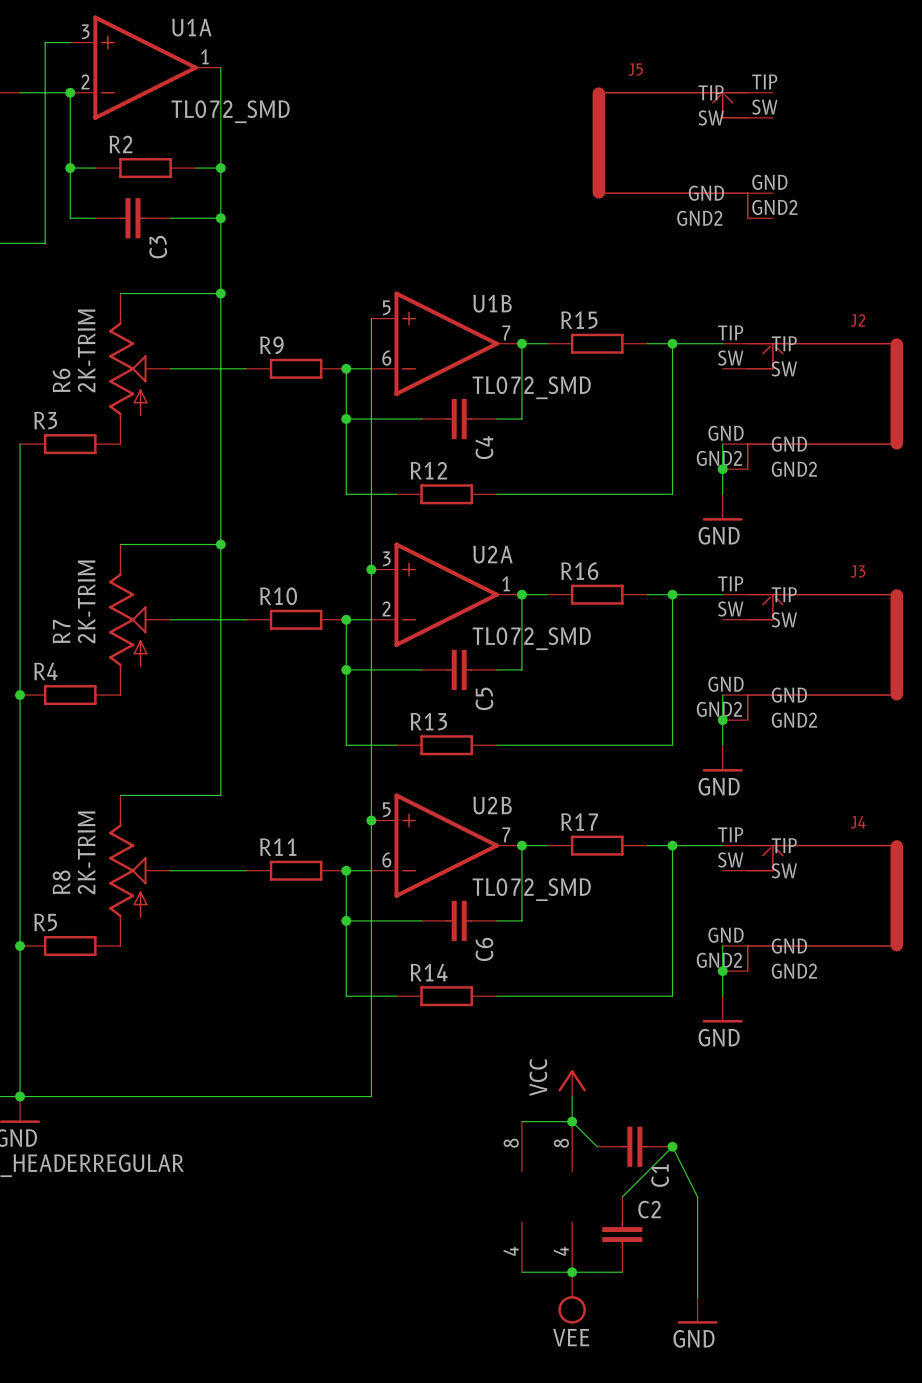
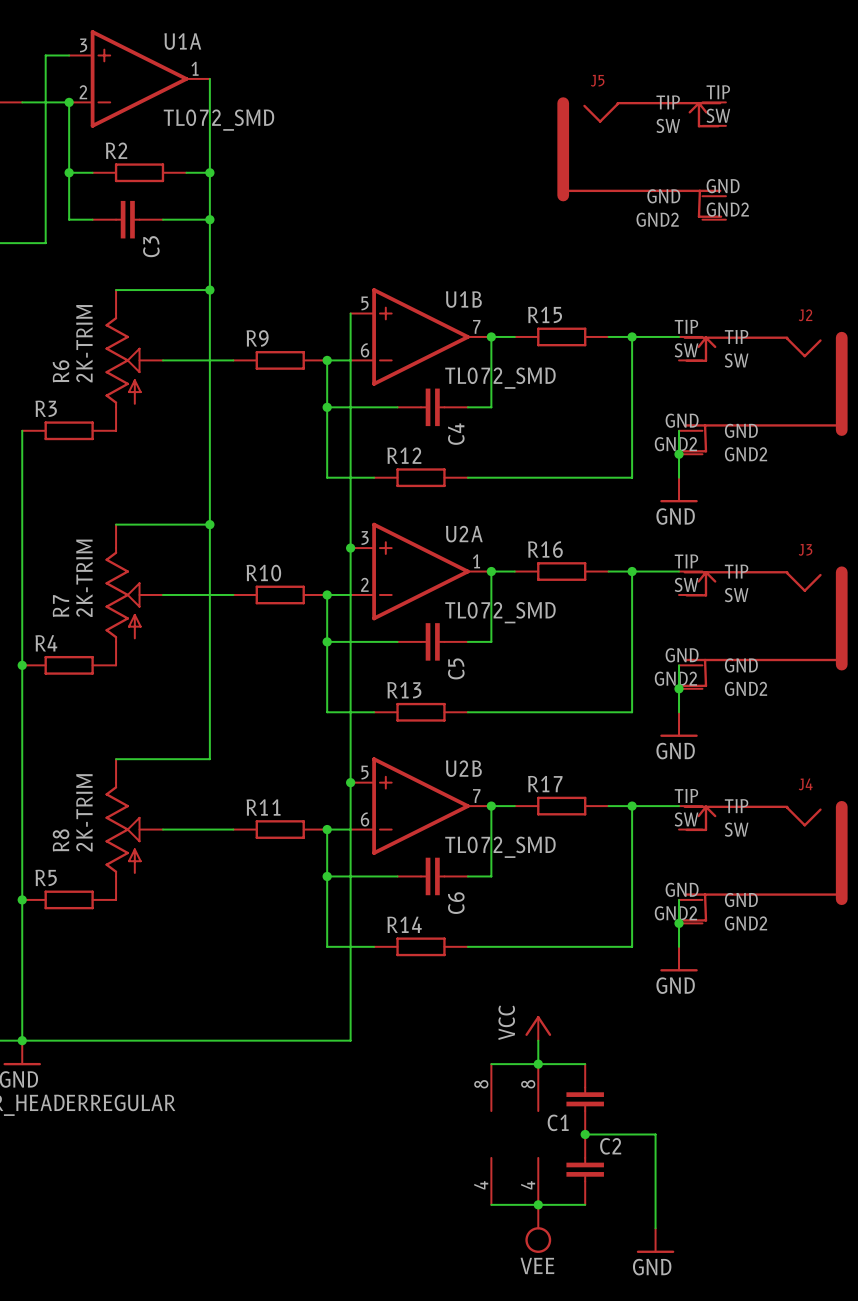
J5 symbol: [592, 87, 773, 220] -> [557, 97, 726, 220]
J2 symbol: [722, 338, 904, 470] -> [679, 331, 848, 455]
J3 symbol: [722, 589, 904, 721] -> [679, 566, 848, 689]
J4 symbol: [722, 840, 904, 972] -> [679, 800, 848, 924]
wire: (572, 1121) (597, 1146) -> (538, 1064) (585, 1064)
C1 rotation: 0° (634, 1146) -> 90° clockwise (585, 1099)
junction: (672, 1146) -> none
wire: (622, 1196) (672, 1146) (697, 1196) -> (585, 1134) (655, 1134)
junction: none -> (585, 1134)

